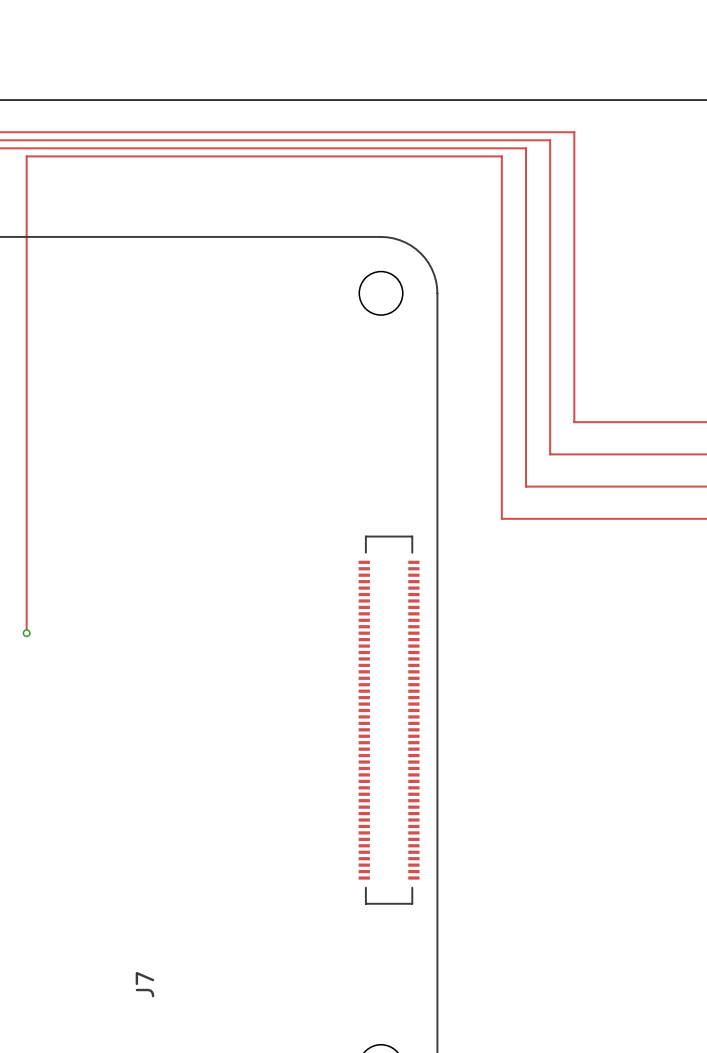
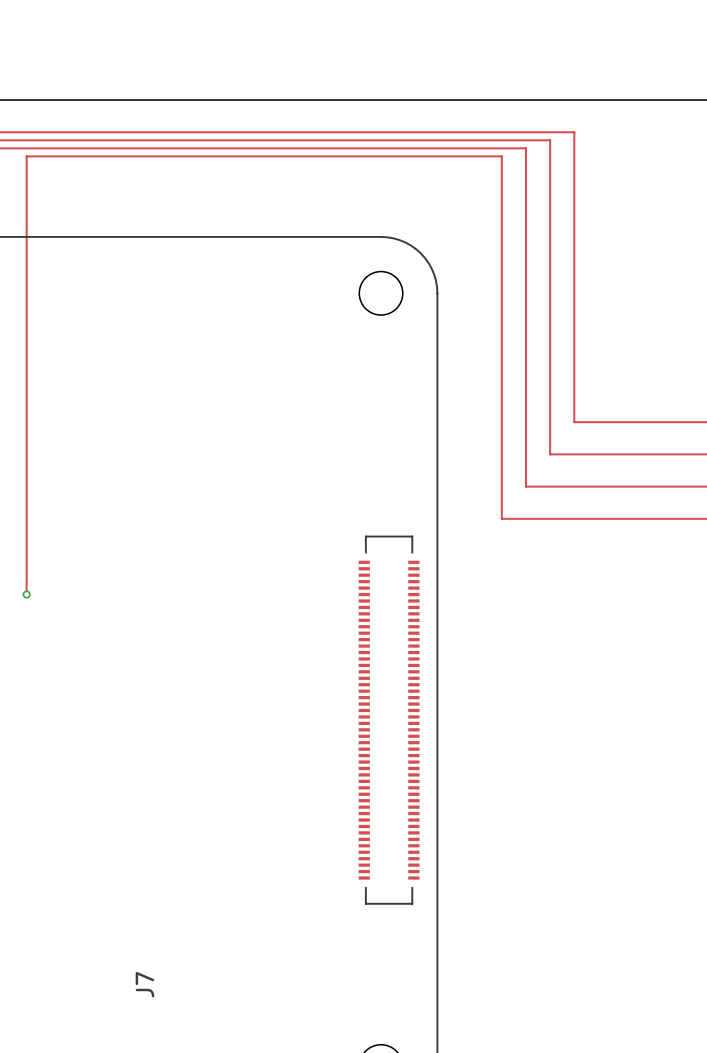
track: (26, 594) (26, 633) -> none
via: none -> (26, 594)
via: (26, 633) -> none

